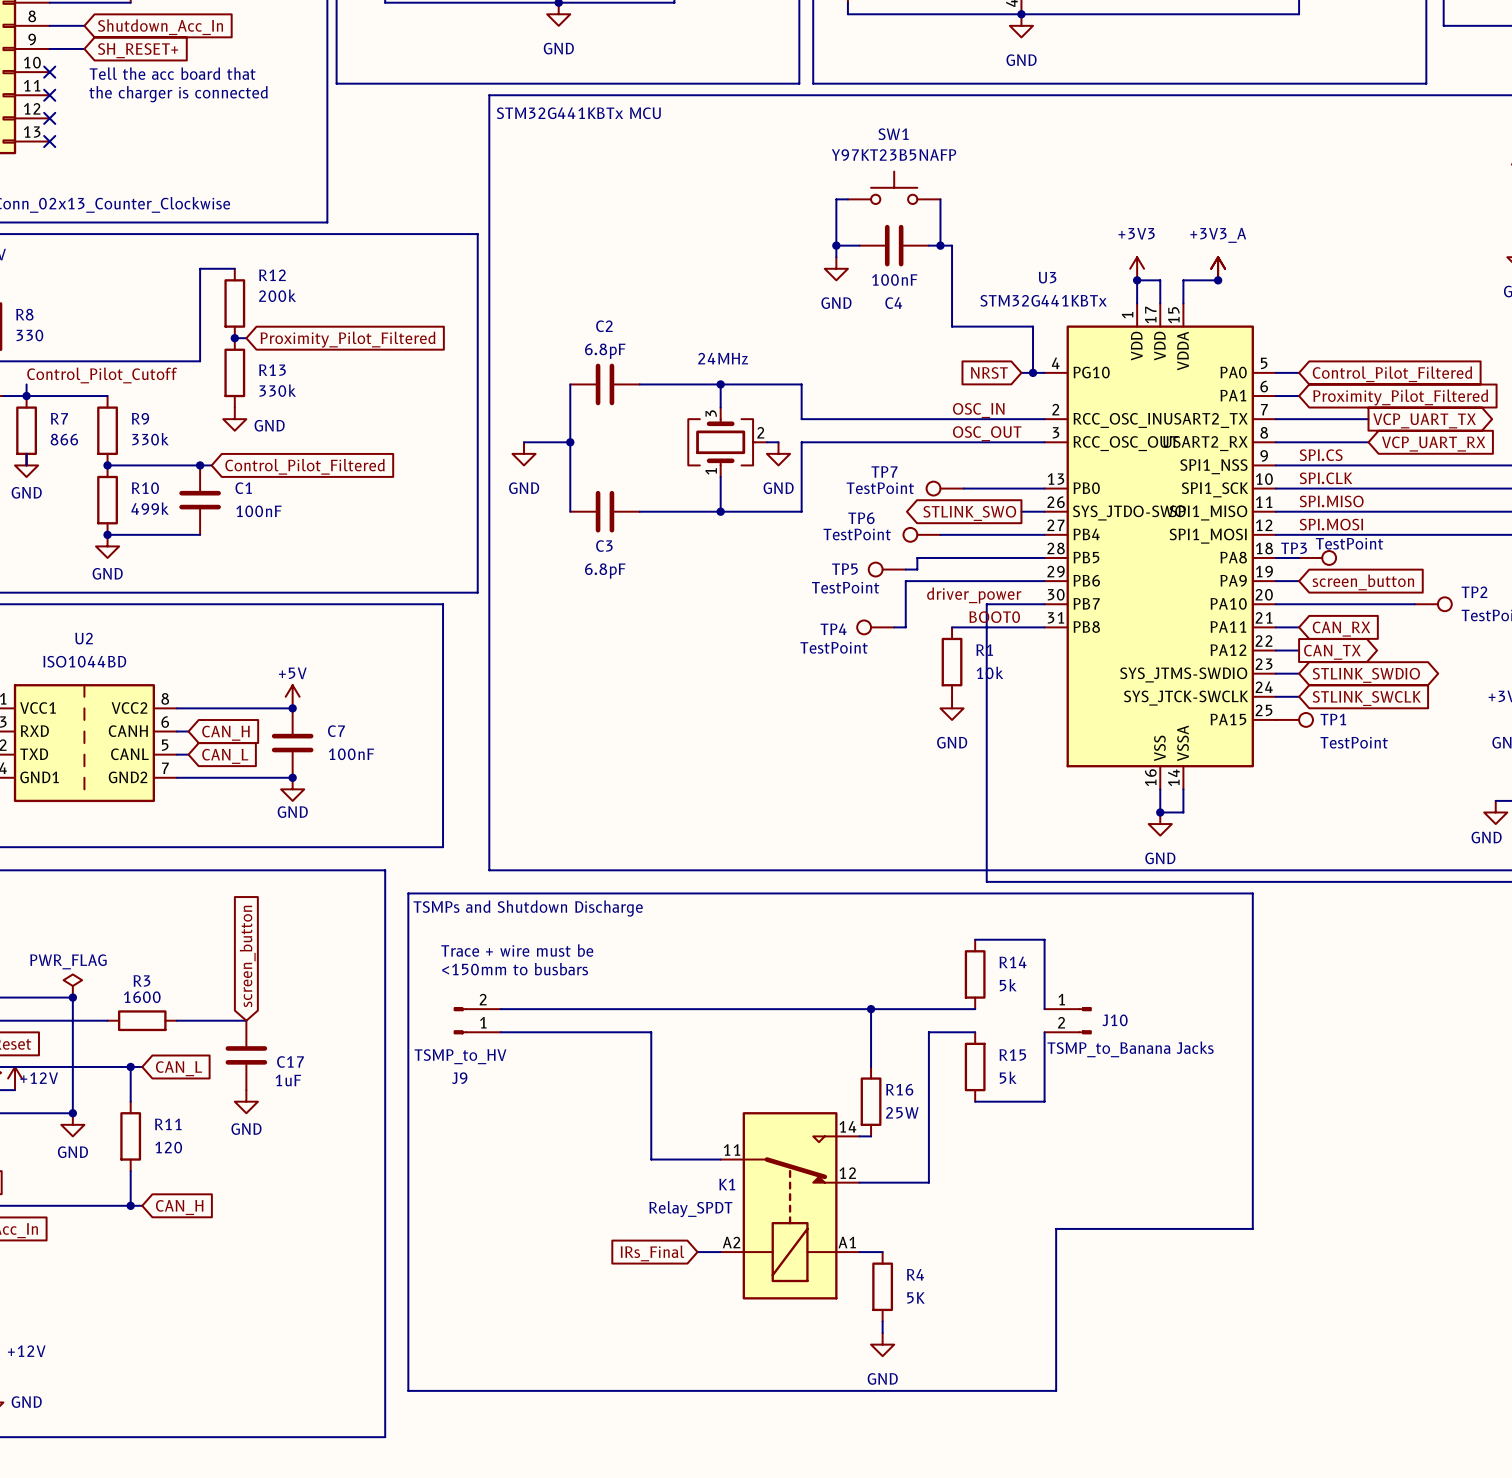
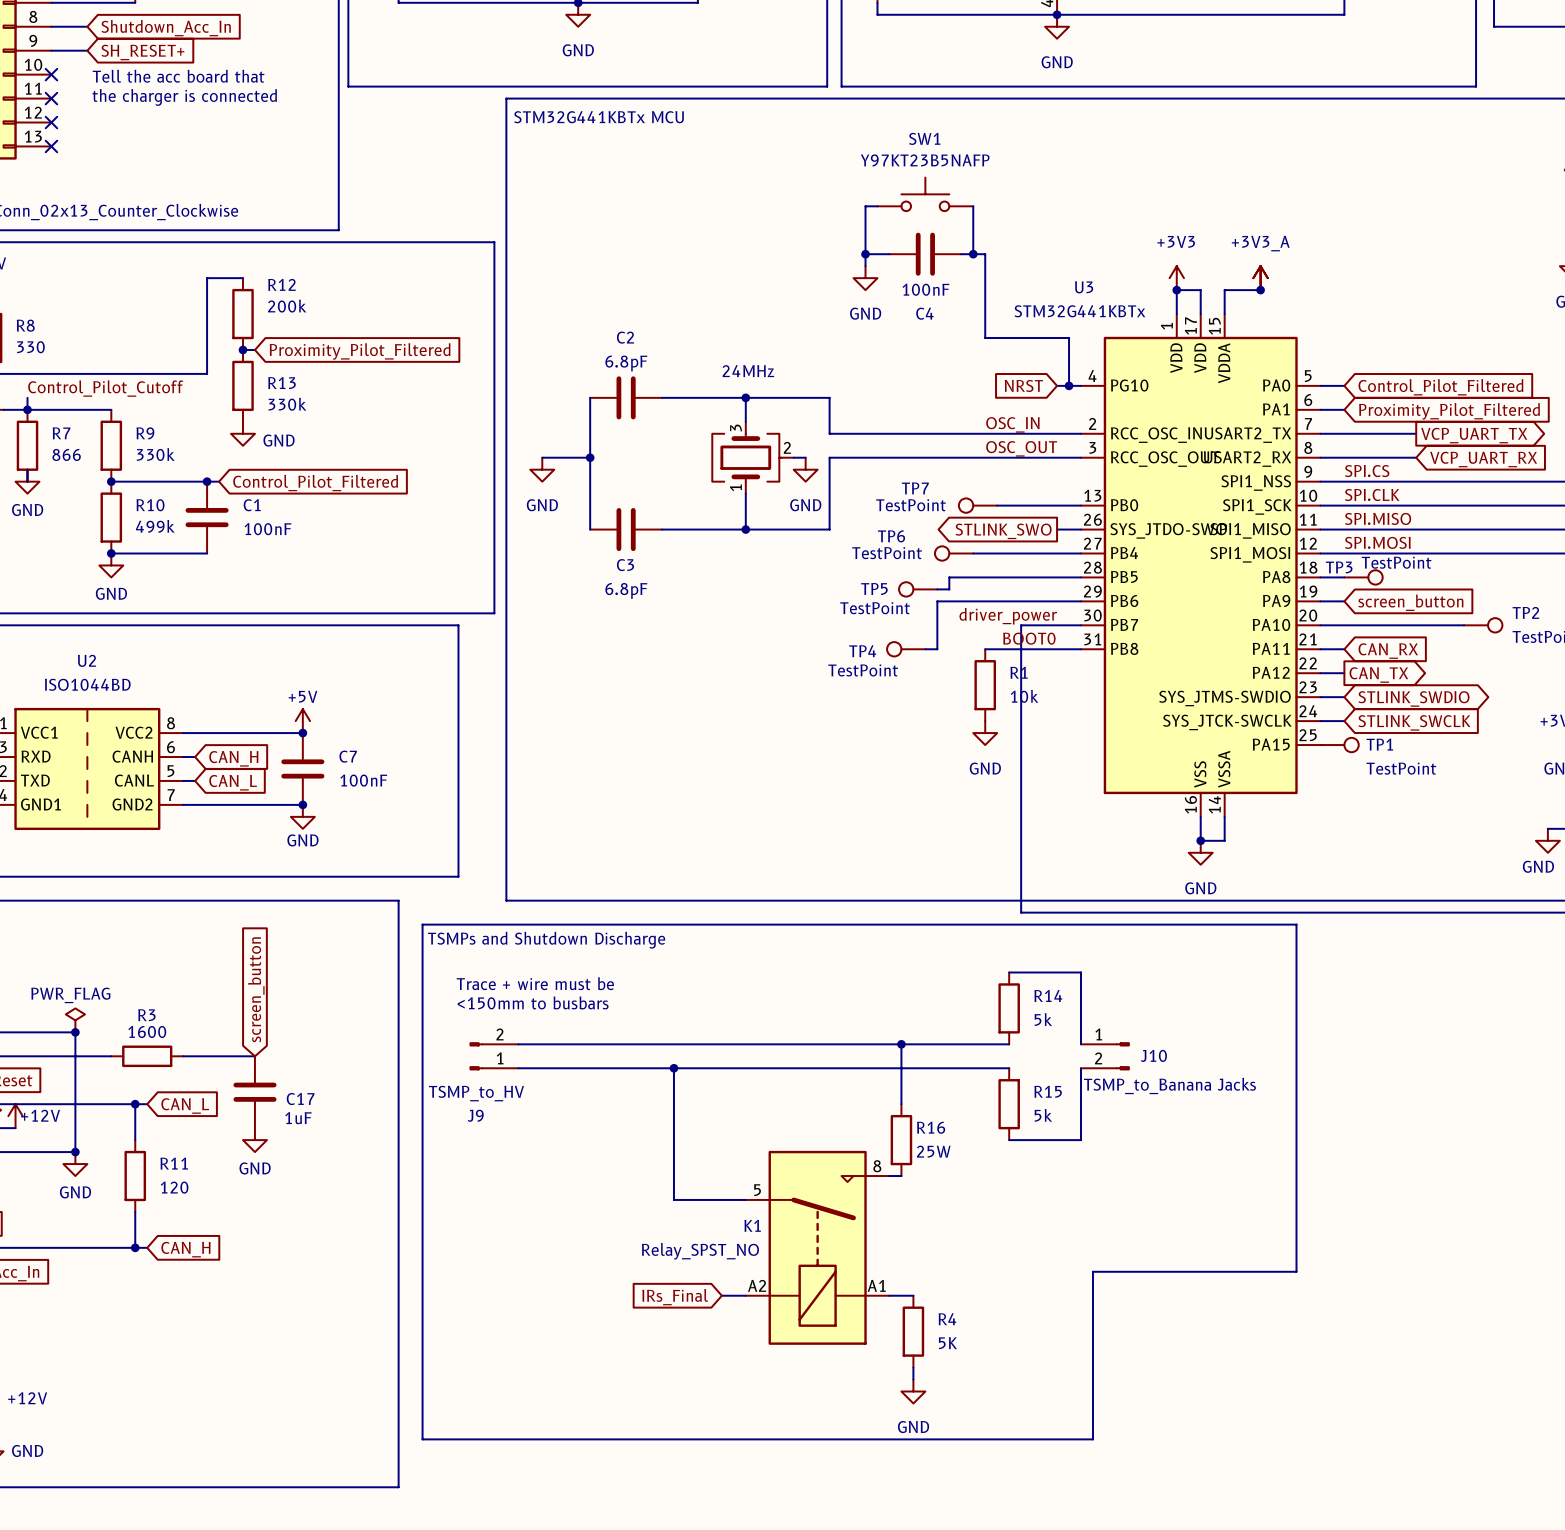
junction: none -> (673, 1068)
wire: (928, 1032) (928, 1182) (859, 1182) -> (961, 1068) (673, 1068)
K1 symbol: [720, 1112, 860, 1300] -> [745, 1150, 890, 1345]
K1 value: Relay_SPDT (690, 1209) -> Relay_SPST_NO (700, 1251)

